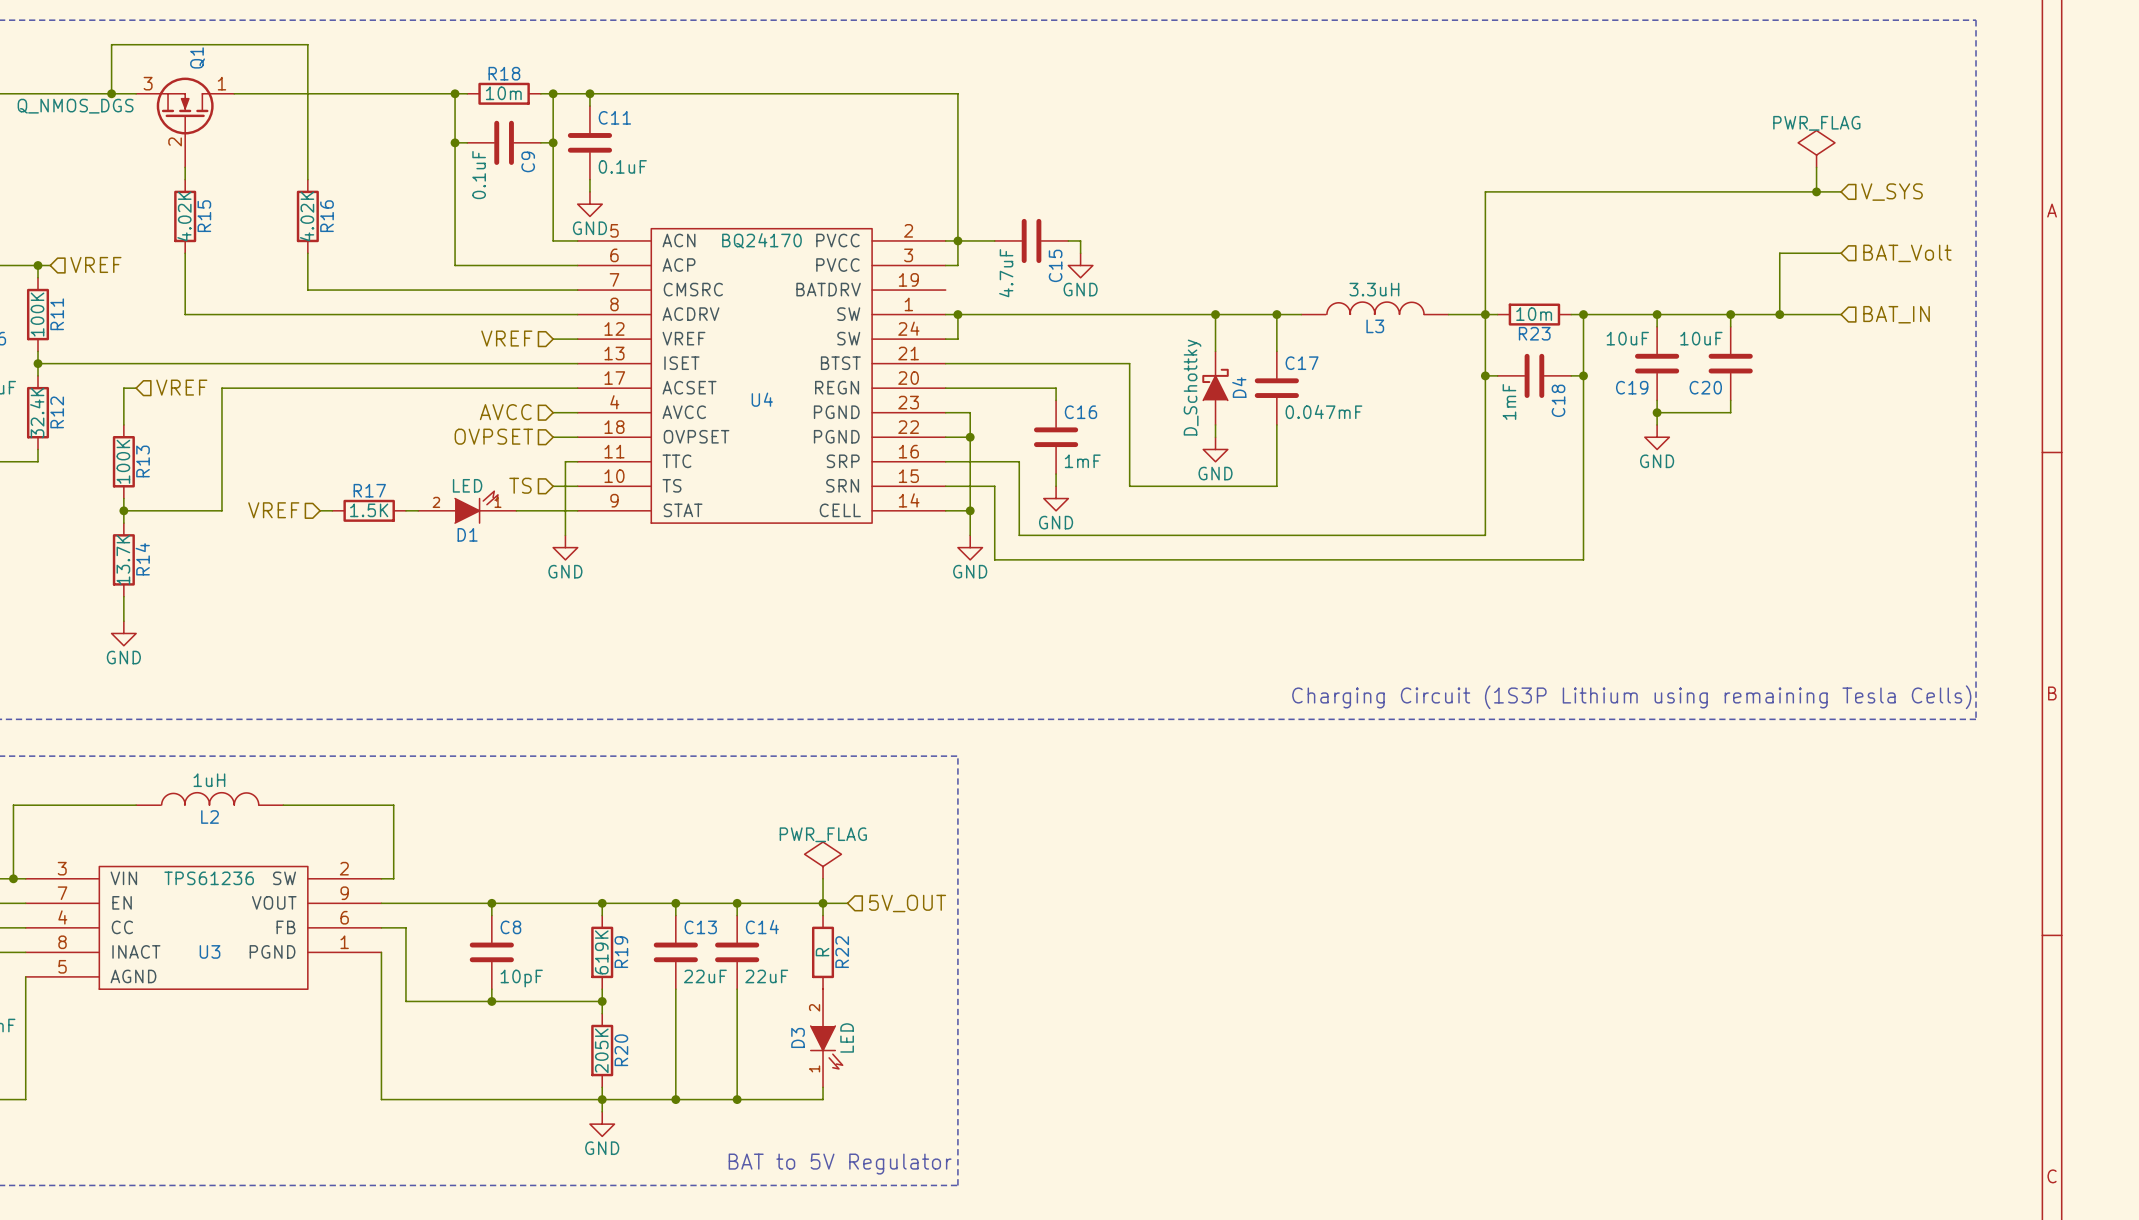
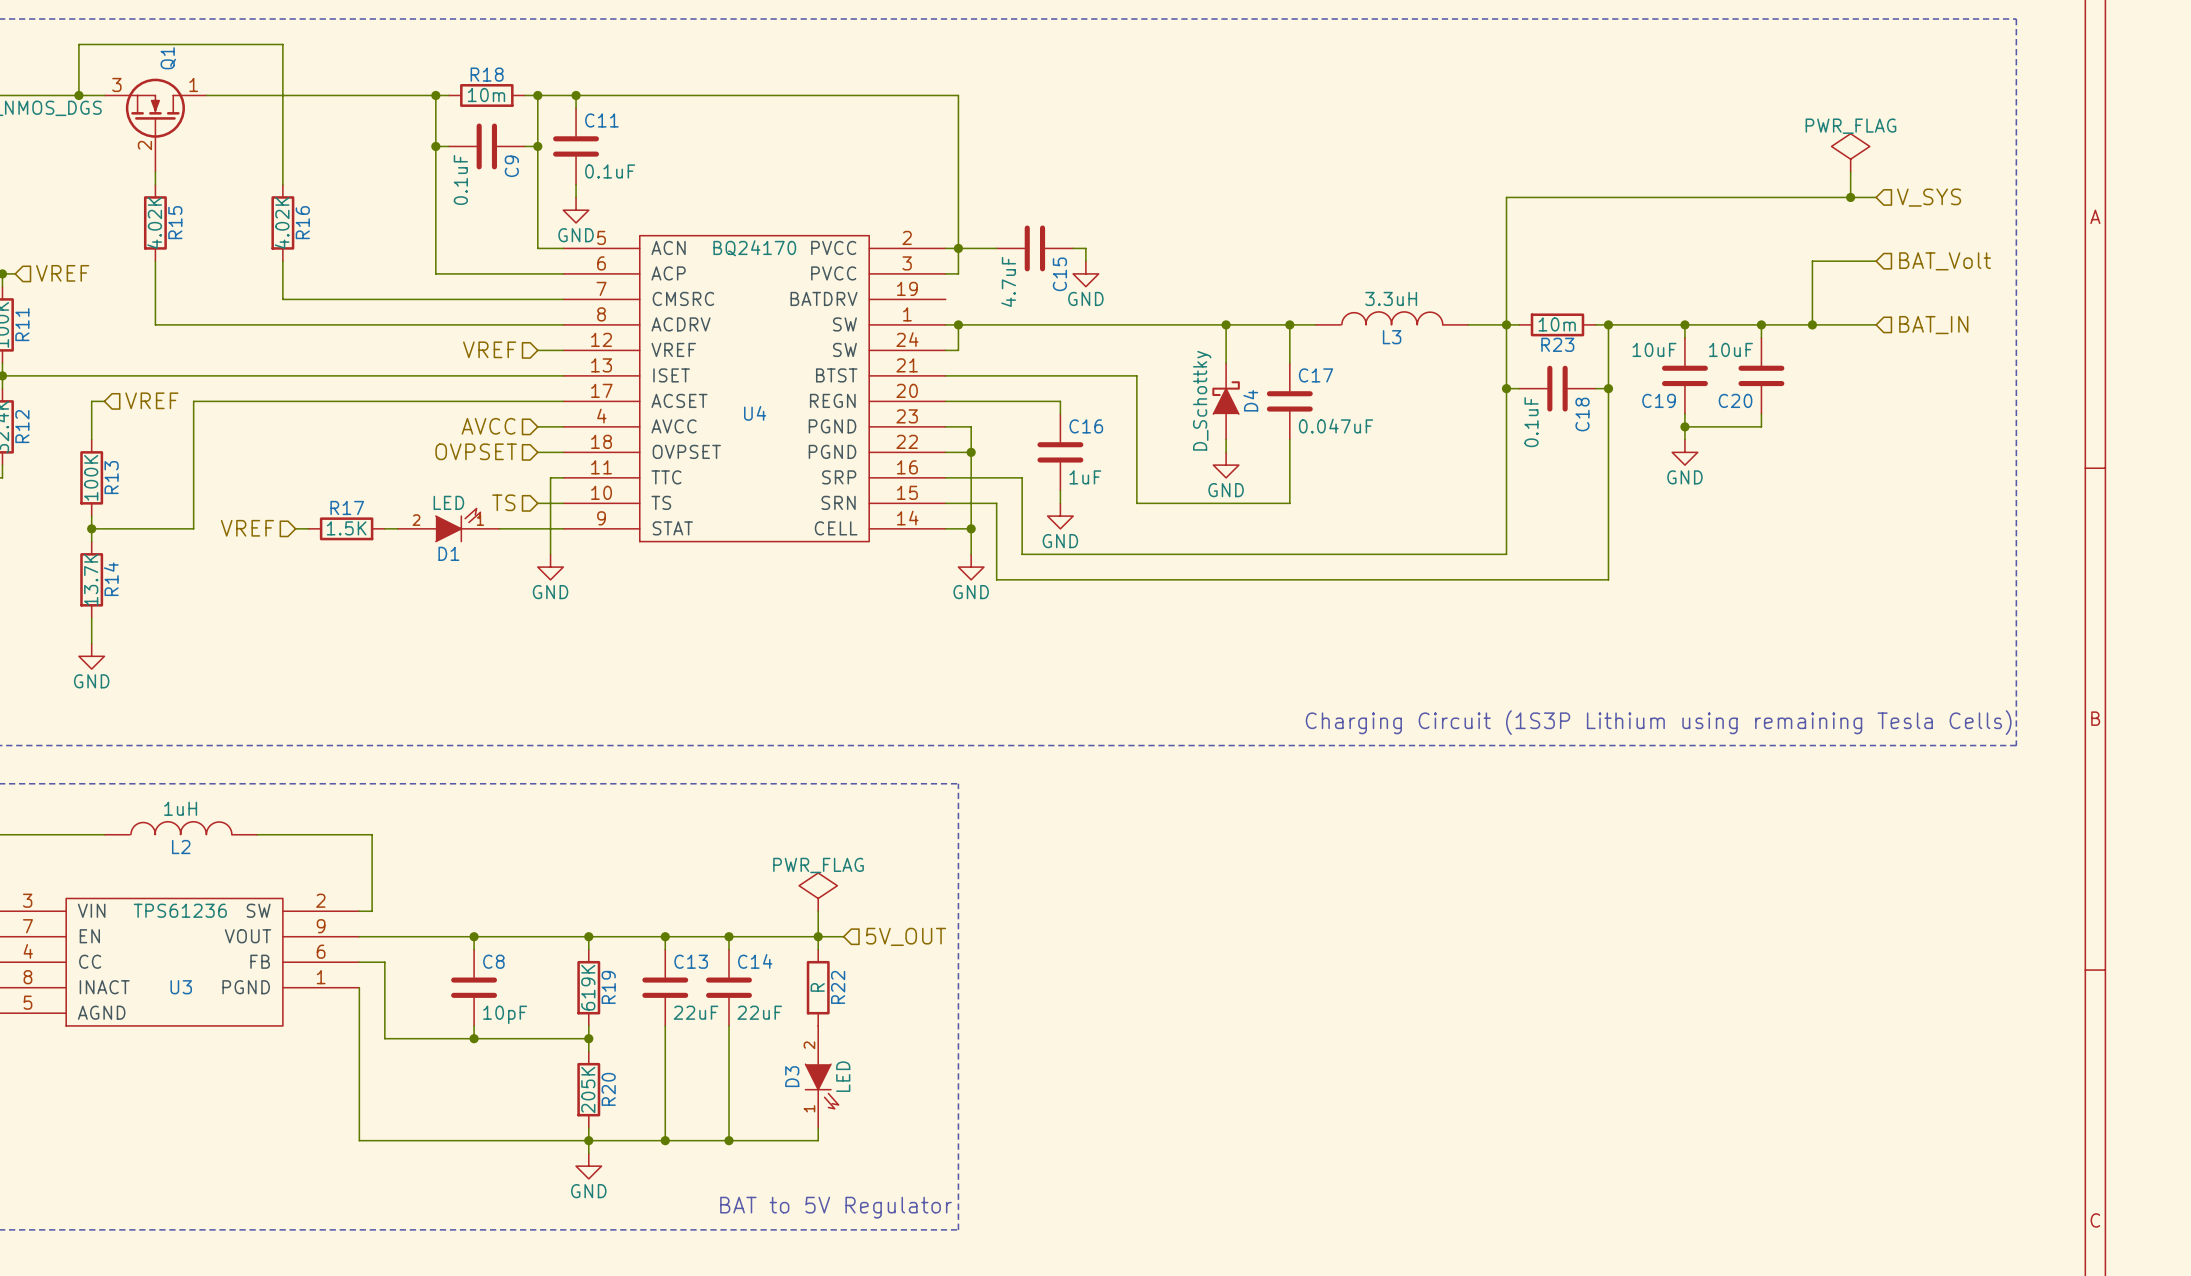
C18 value: 1mF (1509, 401) -> 0.1uF (1531, 422)
C17 value: 0.047mF (1323, 411) -> 0.047uF (1336, 426)
C16 value: 1mF (1082, 461) -> 1uF (1085, 477)

